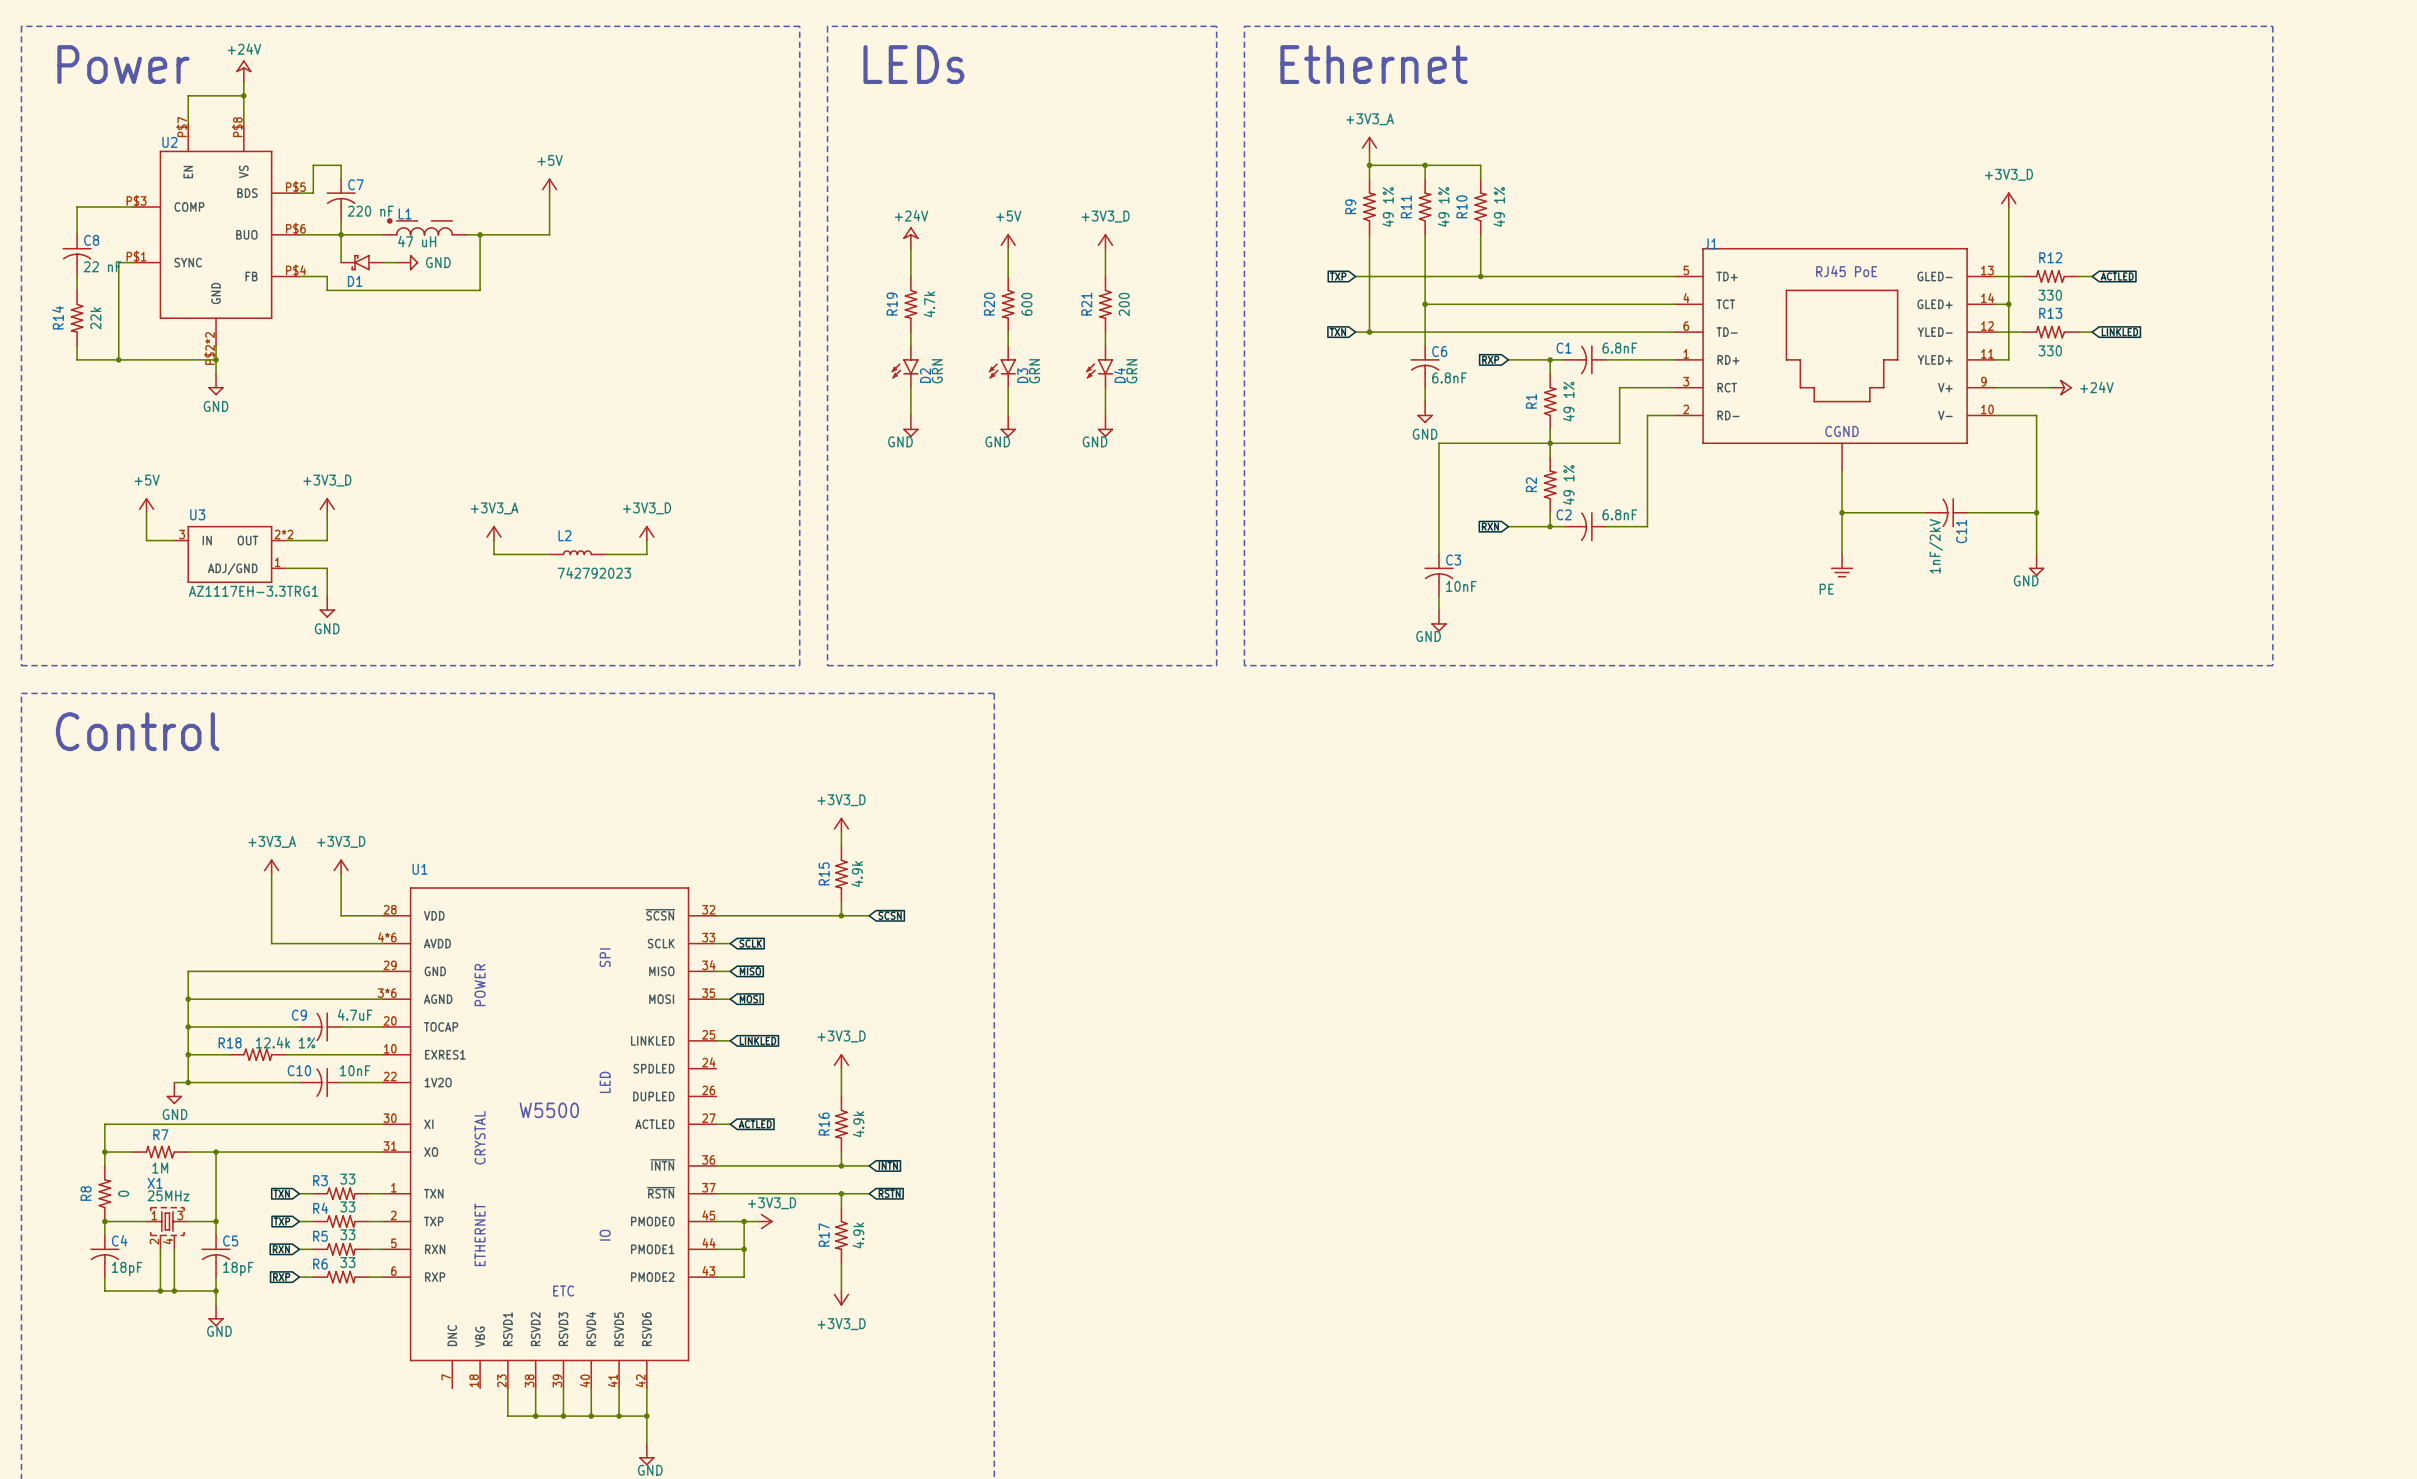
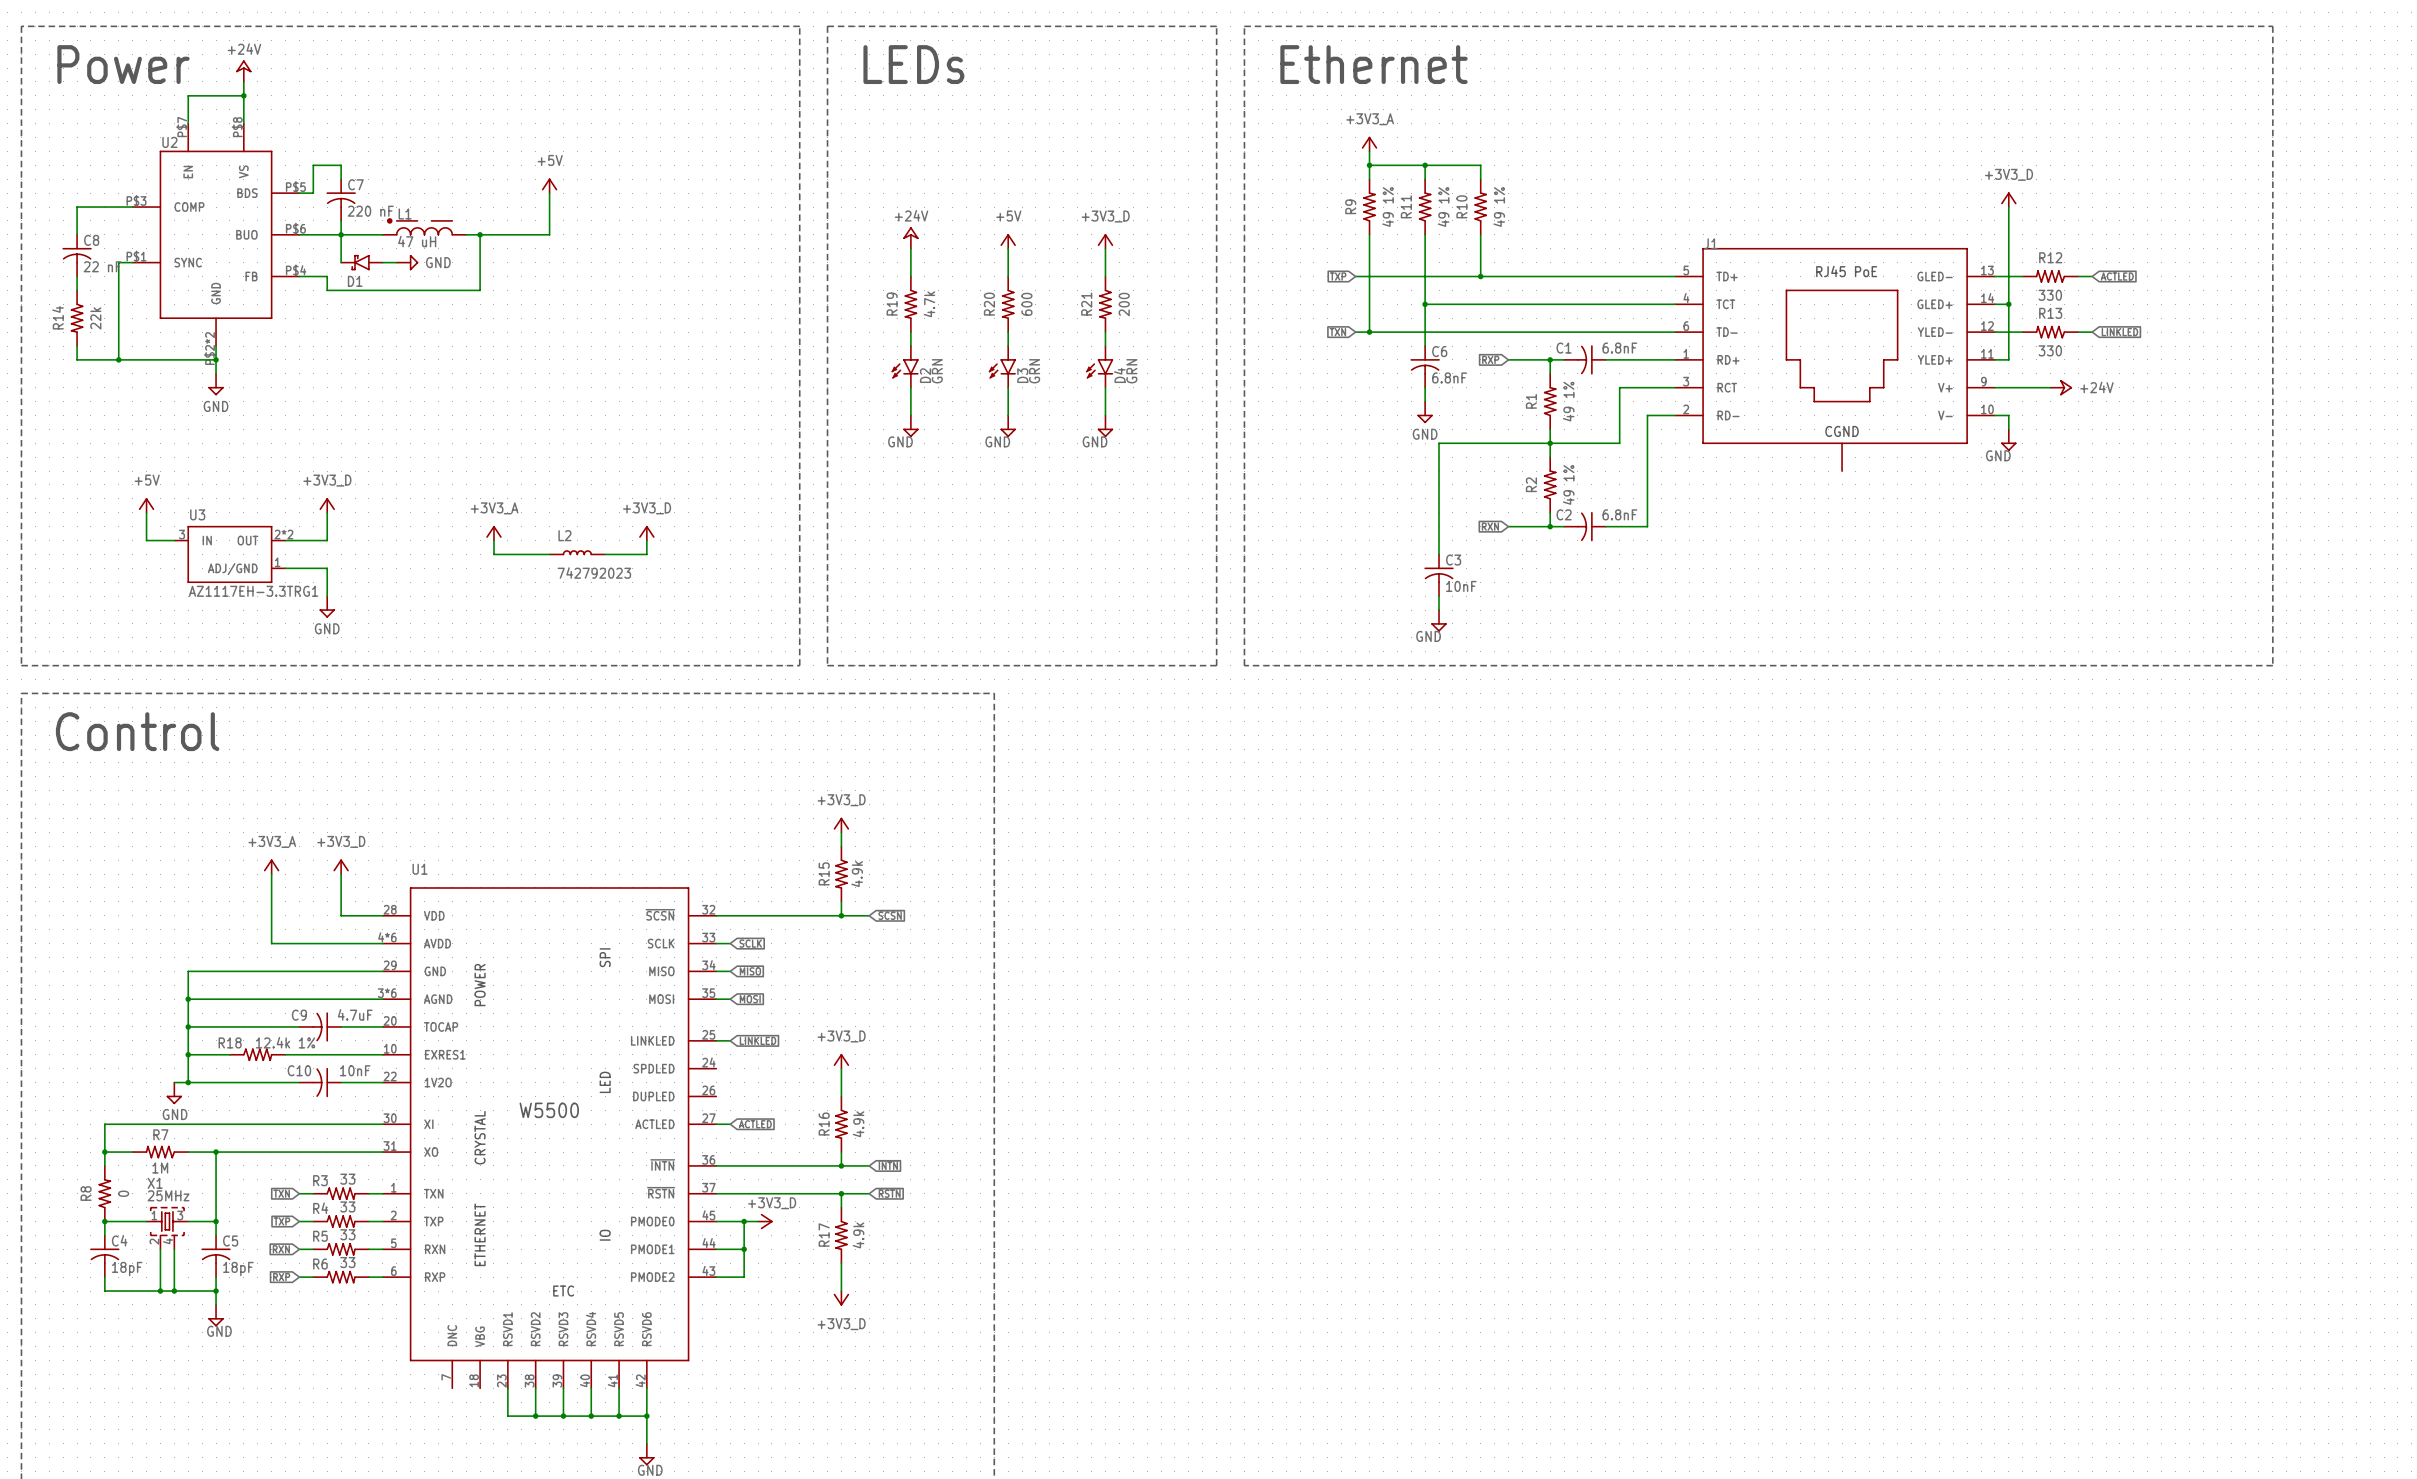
wire: (2008, 415) (2036, 415) (2036, 554) -> (2008, 415) (2008, 429)
wire: (1842, 471) (1842, 554) -> none
wire: (1842, 512) (1925, 512) -> none
junction: (1842, 512) -> none
C11: 1nF/2kV (1946, 512) -> none
wire: (1967, 512) (2036, 512) -> none
junction: (2036, 512) -> none
power symbol: PE (1842, 565) -> none
power symbol position: GND (2036, 565) -> GND (2008, 440)

